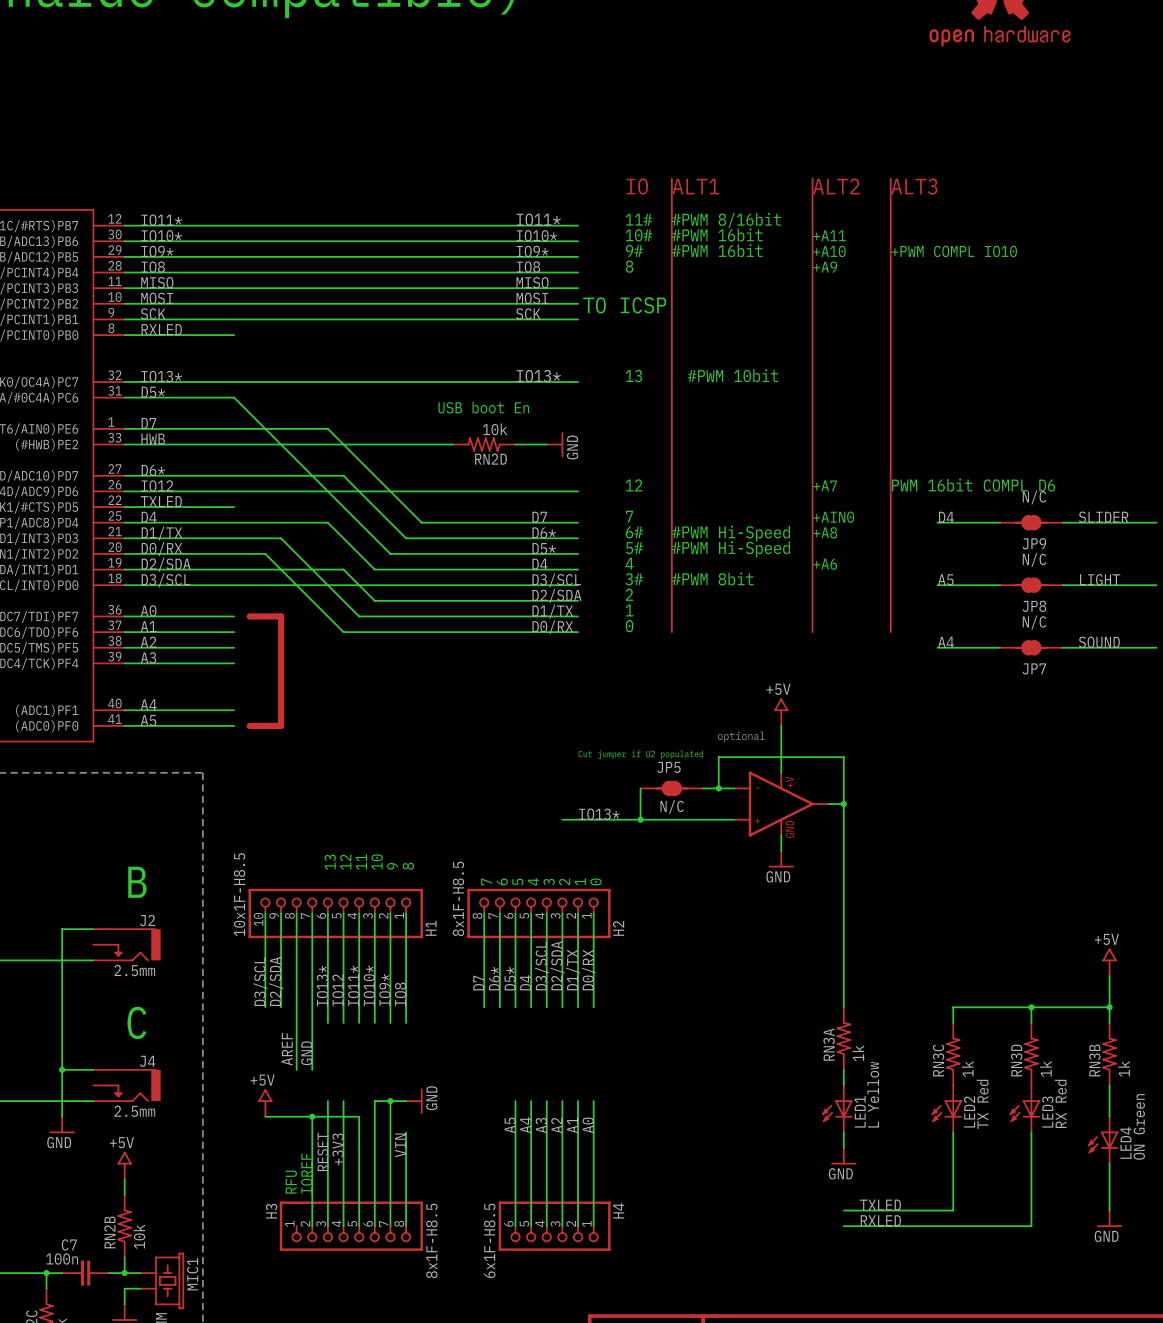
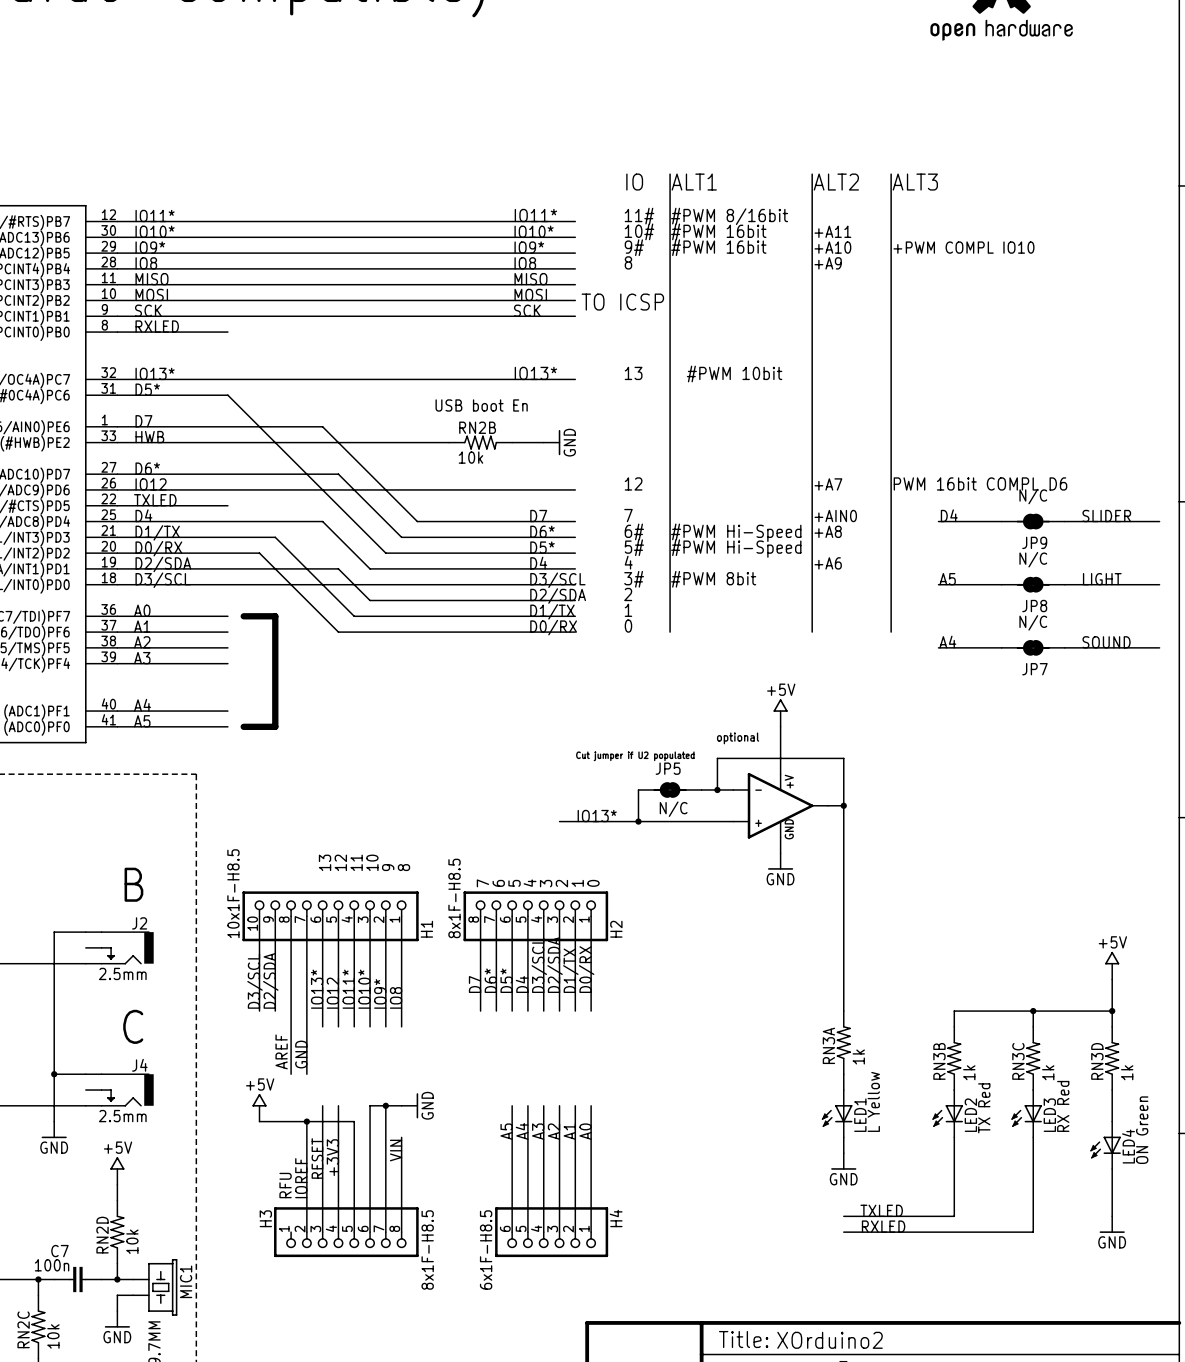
RN2D: 10k (484, 444) -> none
RN2B: none -> 10k (480, 442)
RN3C name: RN3C (938, 1060) -> RN3B (939, 1061)
RN3D name: RN3D (1016, 1060) -> RN3C (1018, 1061)
RN3B name: RN3B (1094, 1060) -> RN3D (1097, 1061)
RN2B name: RN2B (109, 1232) -> RN2D (102, 1235)

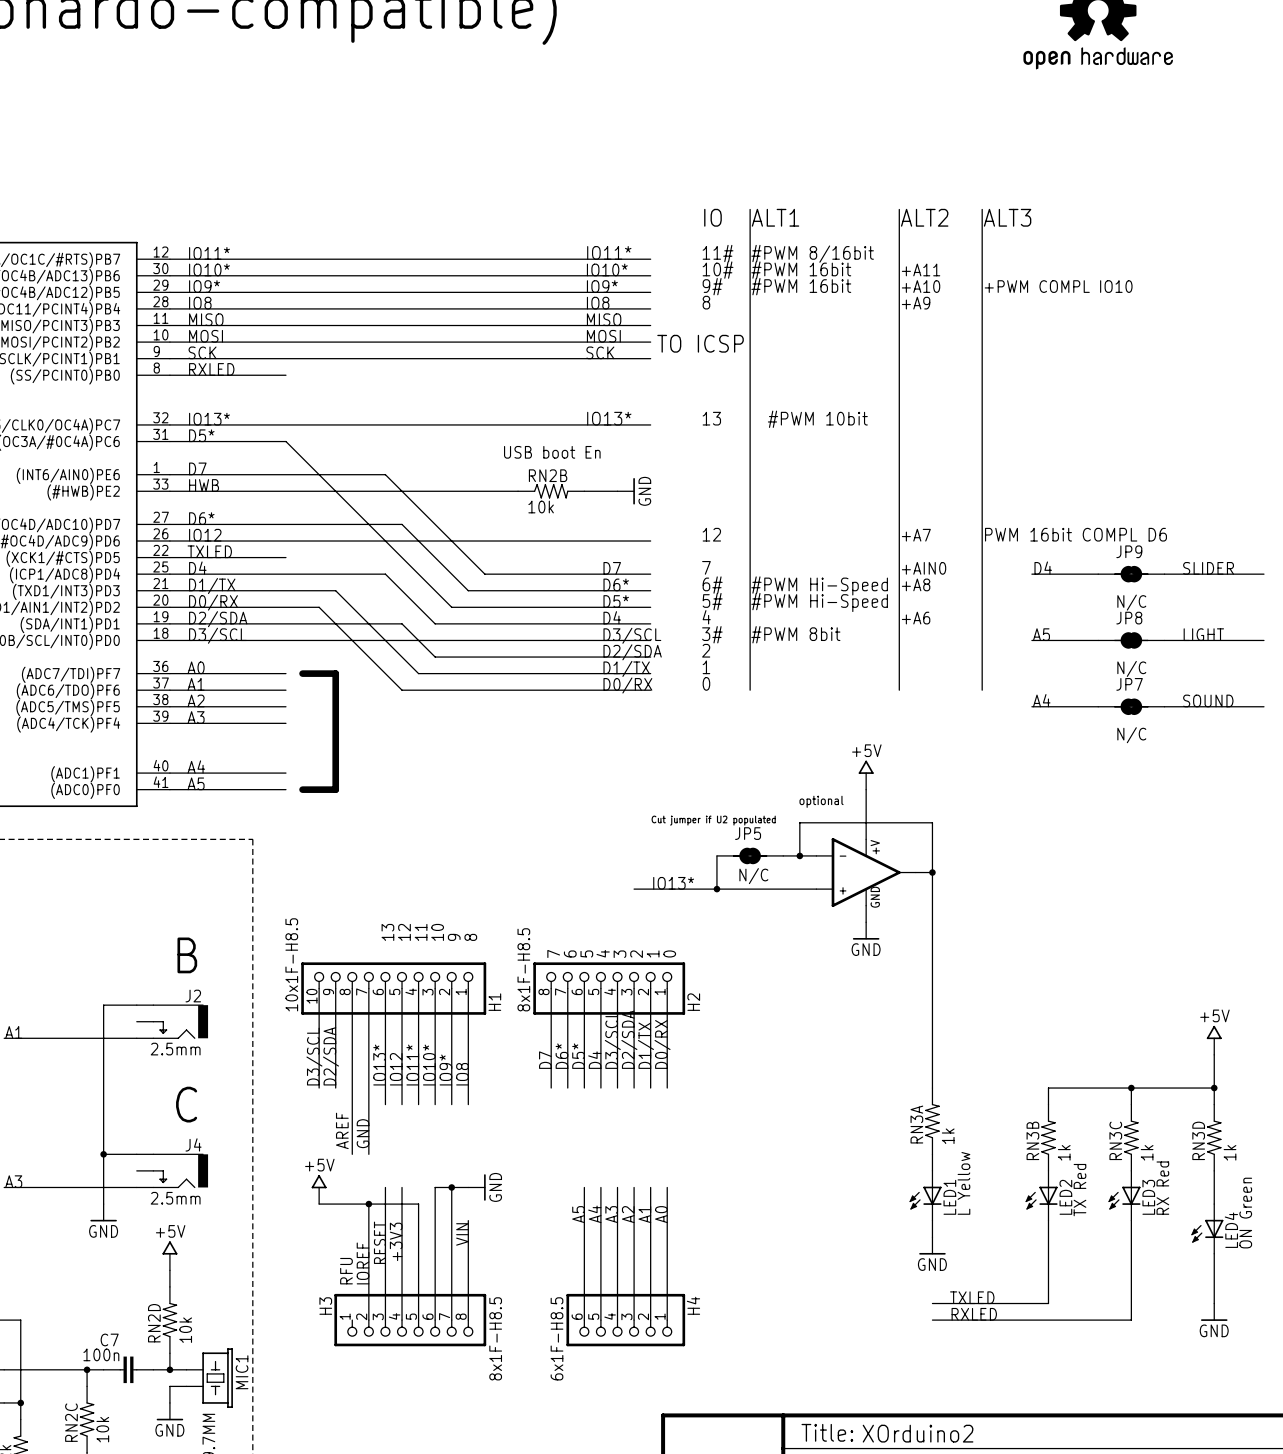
JP9 value position: N/C (1033, 496) -> N/C (1131, 602)
JP9 name position: JP9 (1034, 542) -> JP9 (1129, 551)
JP8 value position: N/C (1033, 559) -> N/C (1131, 668)
JP8 name position: JP8 (1034, 606) -> JP8 (1129, 618)
JP7 value position: N/C (1033, 622) -> N/C (1131, 735)
JP7 name position: JP7 (1034, 669) -> JP7 (1129, 684)

